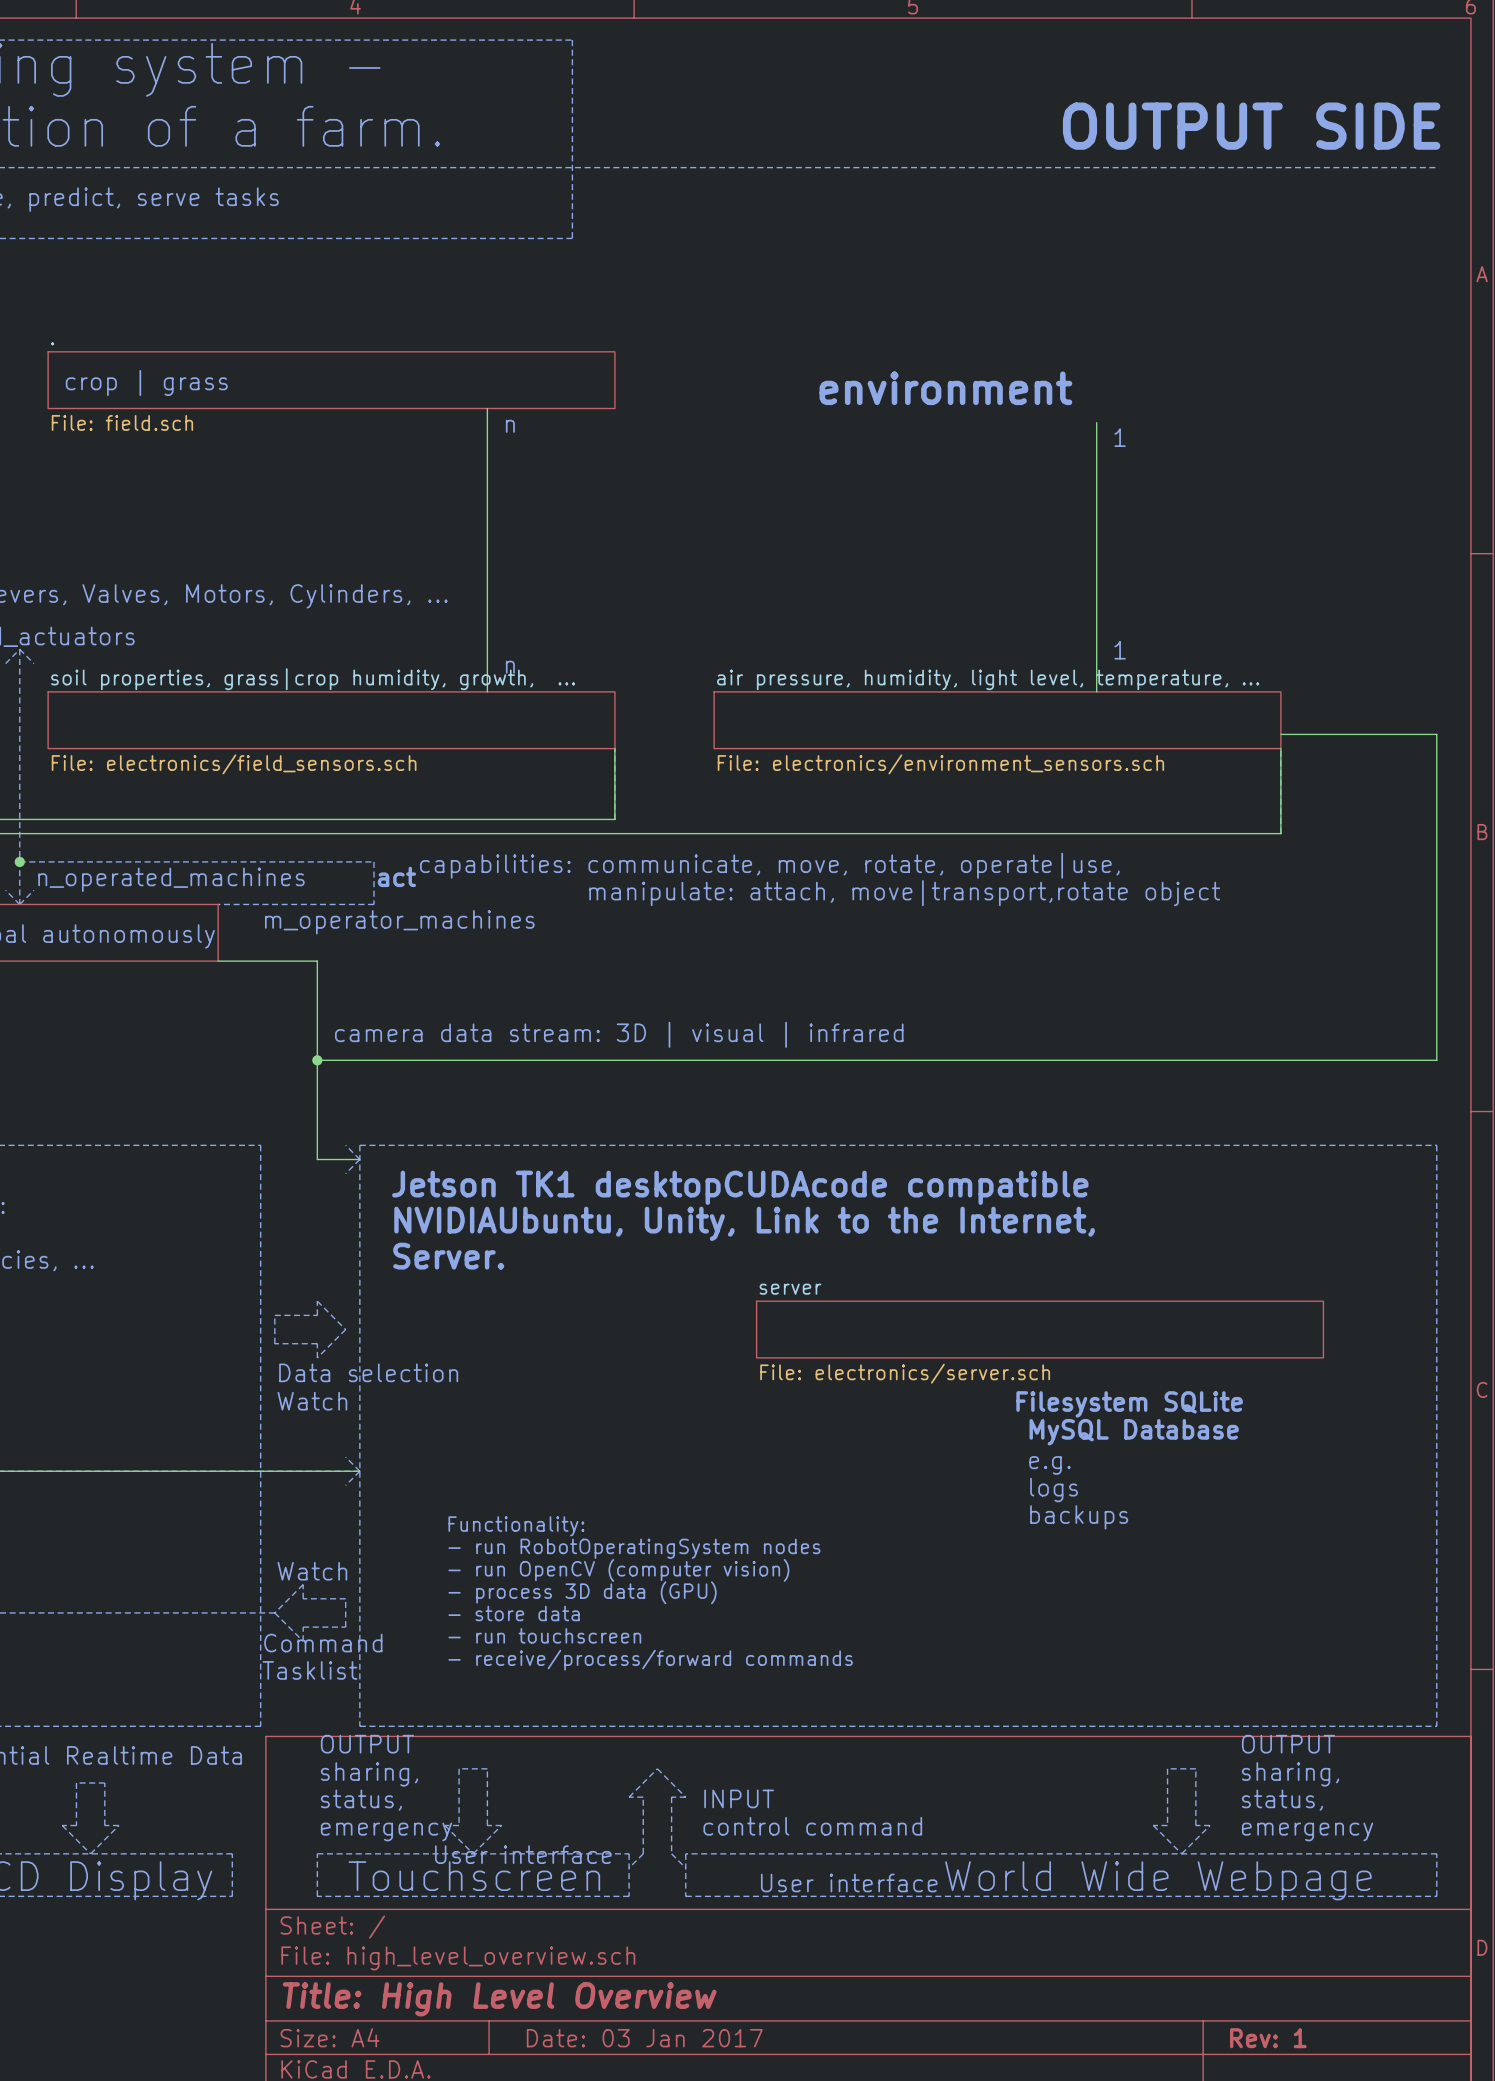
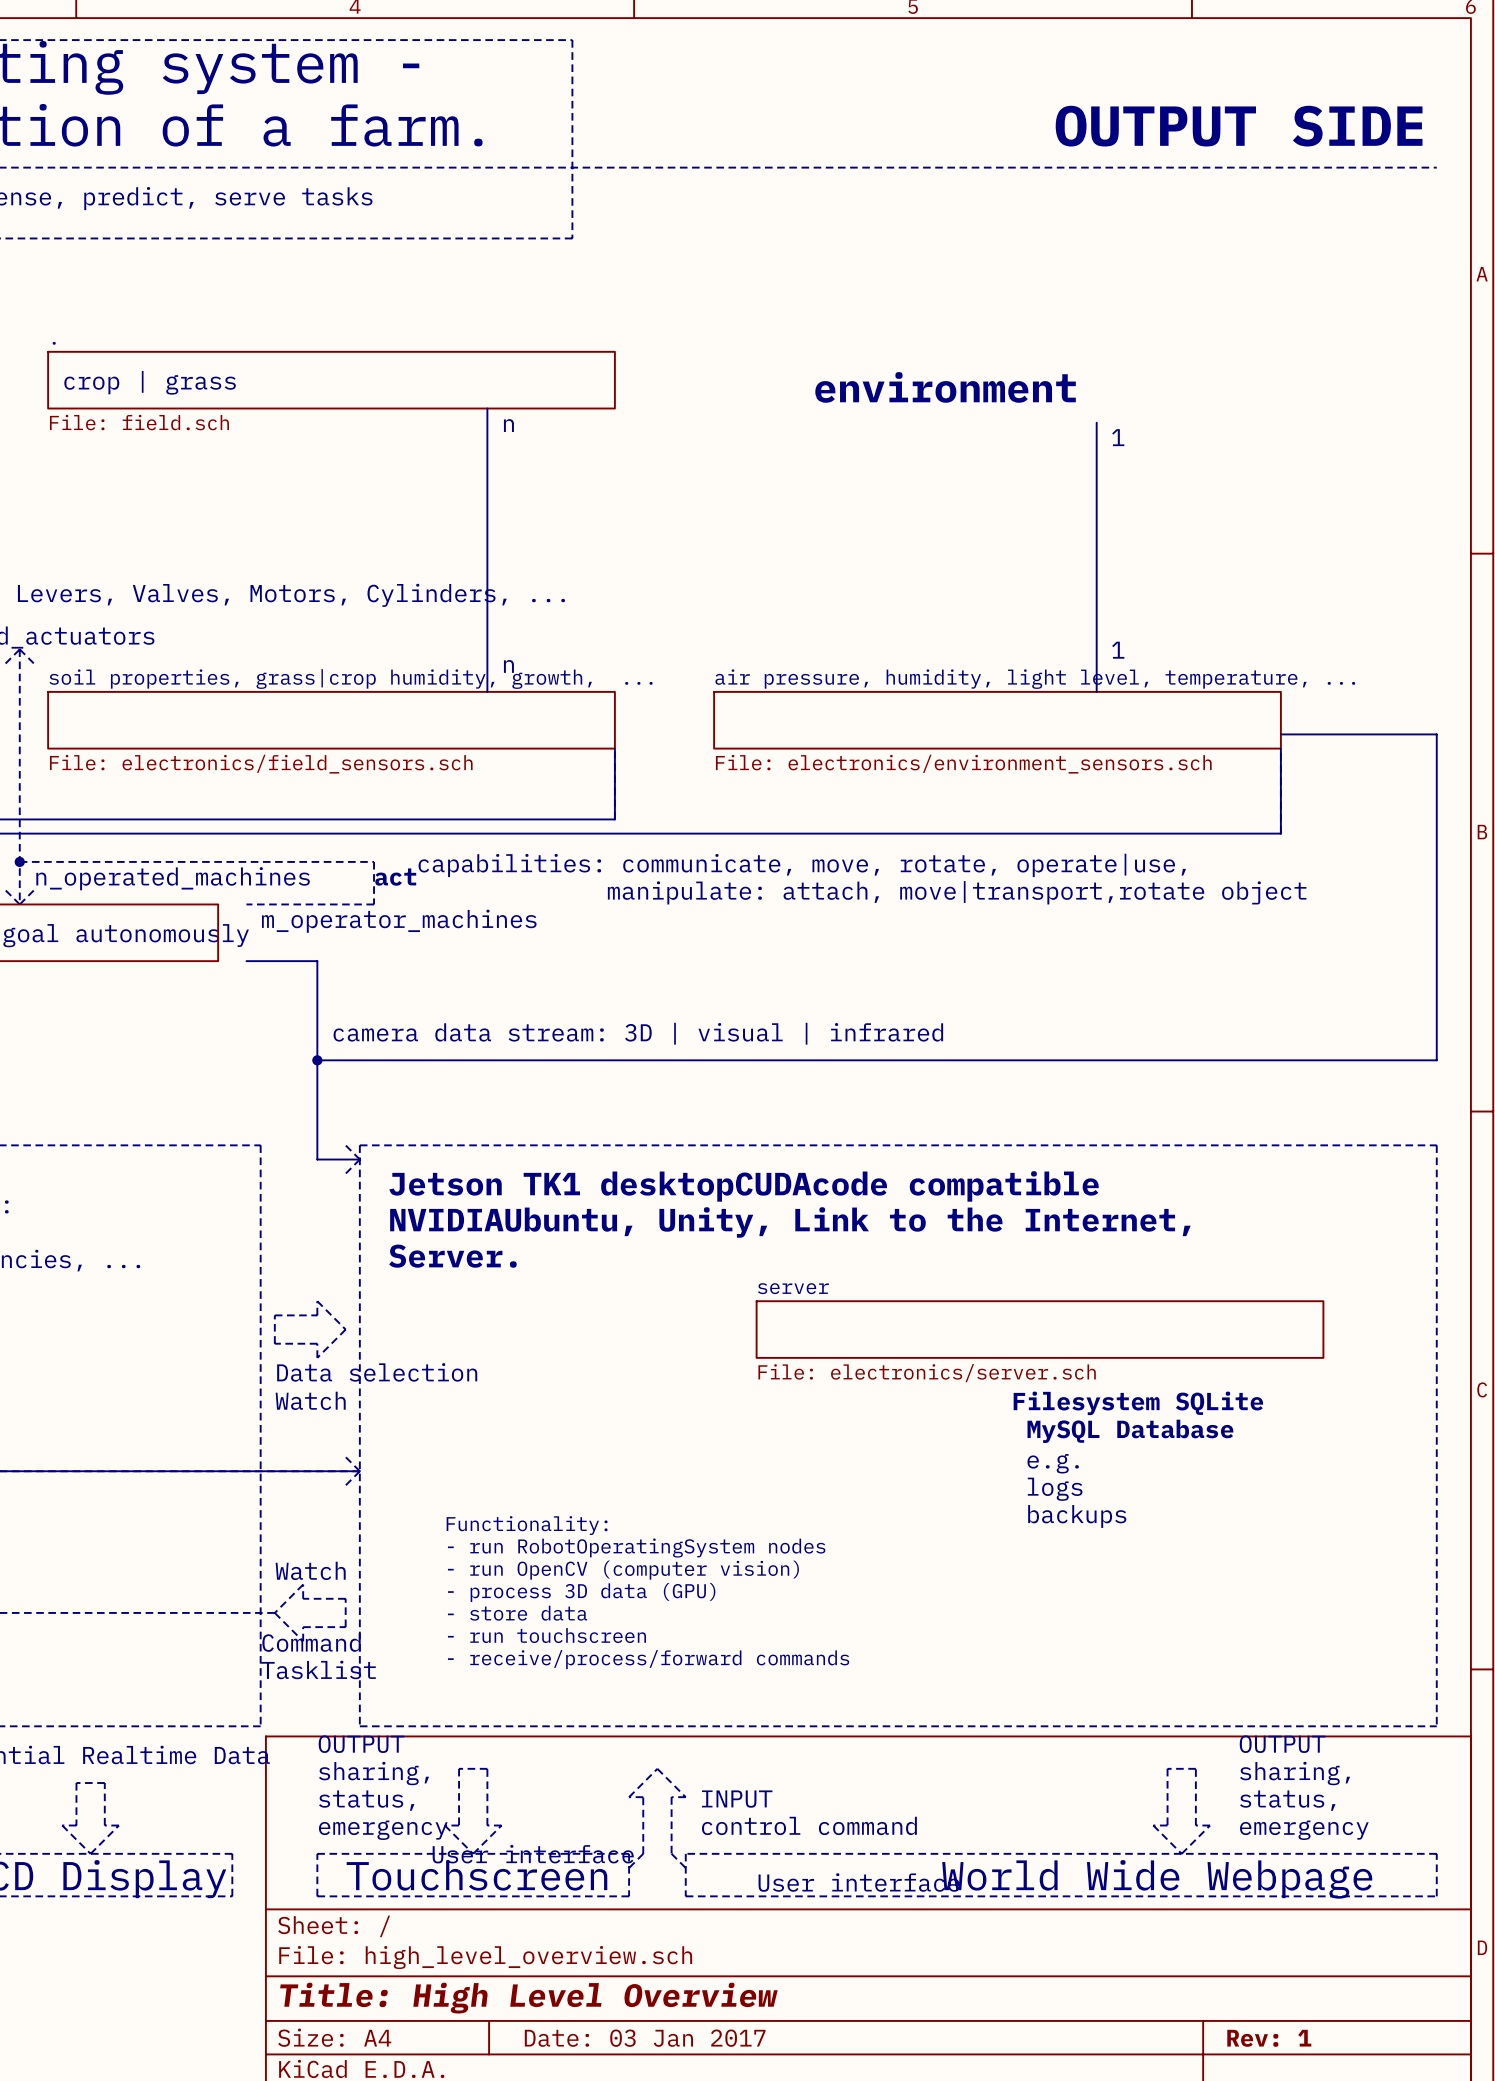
line: (218, 904) (246, 904) -> none
wire: (218, 961) (246, 961) -> none

